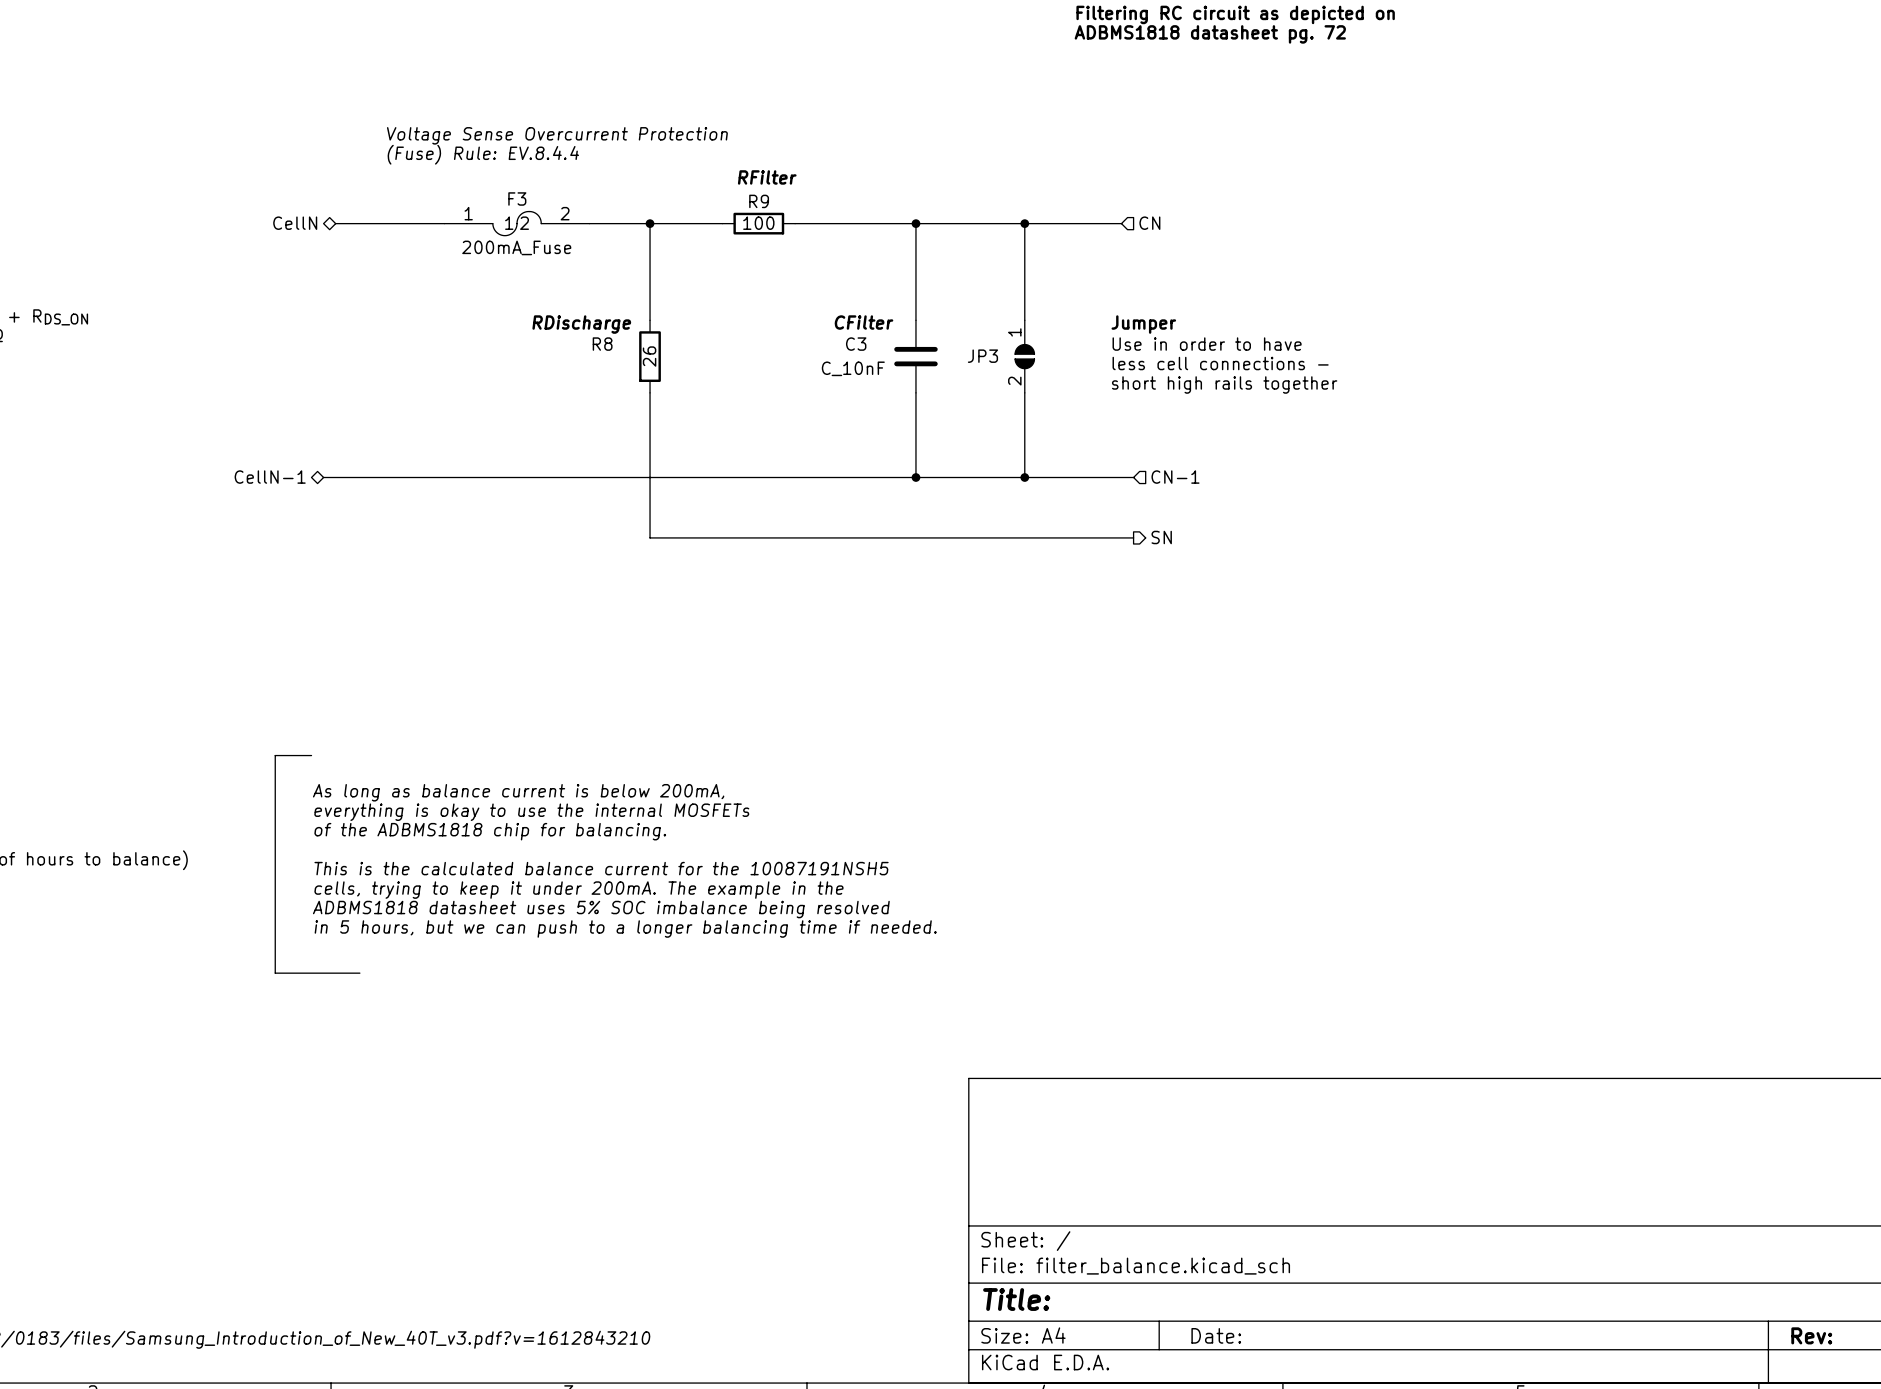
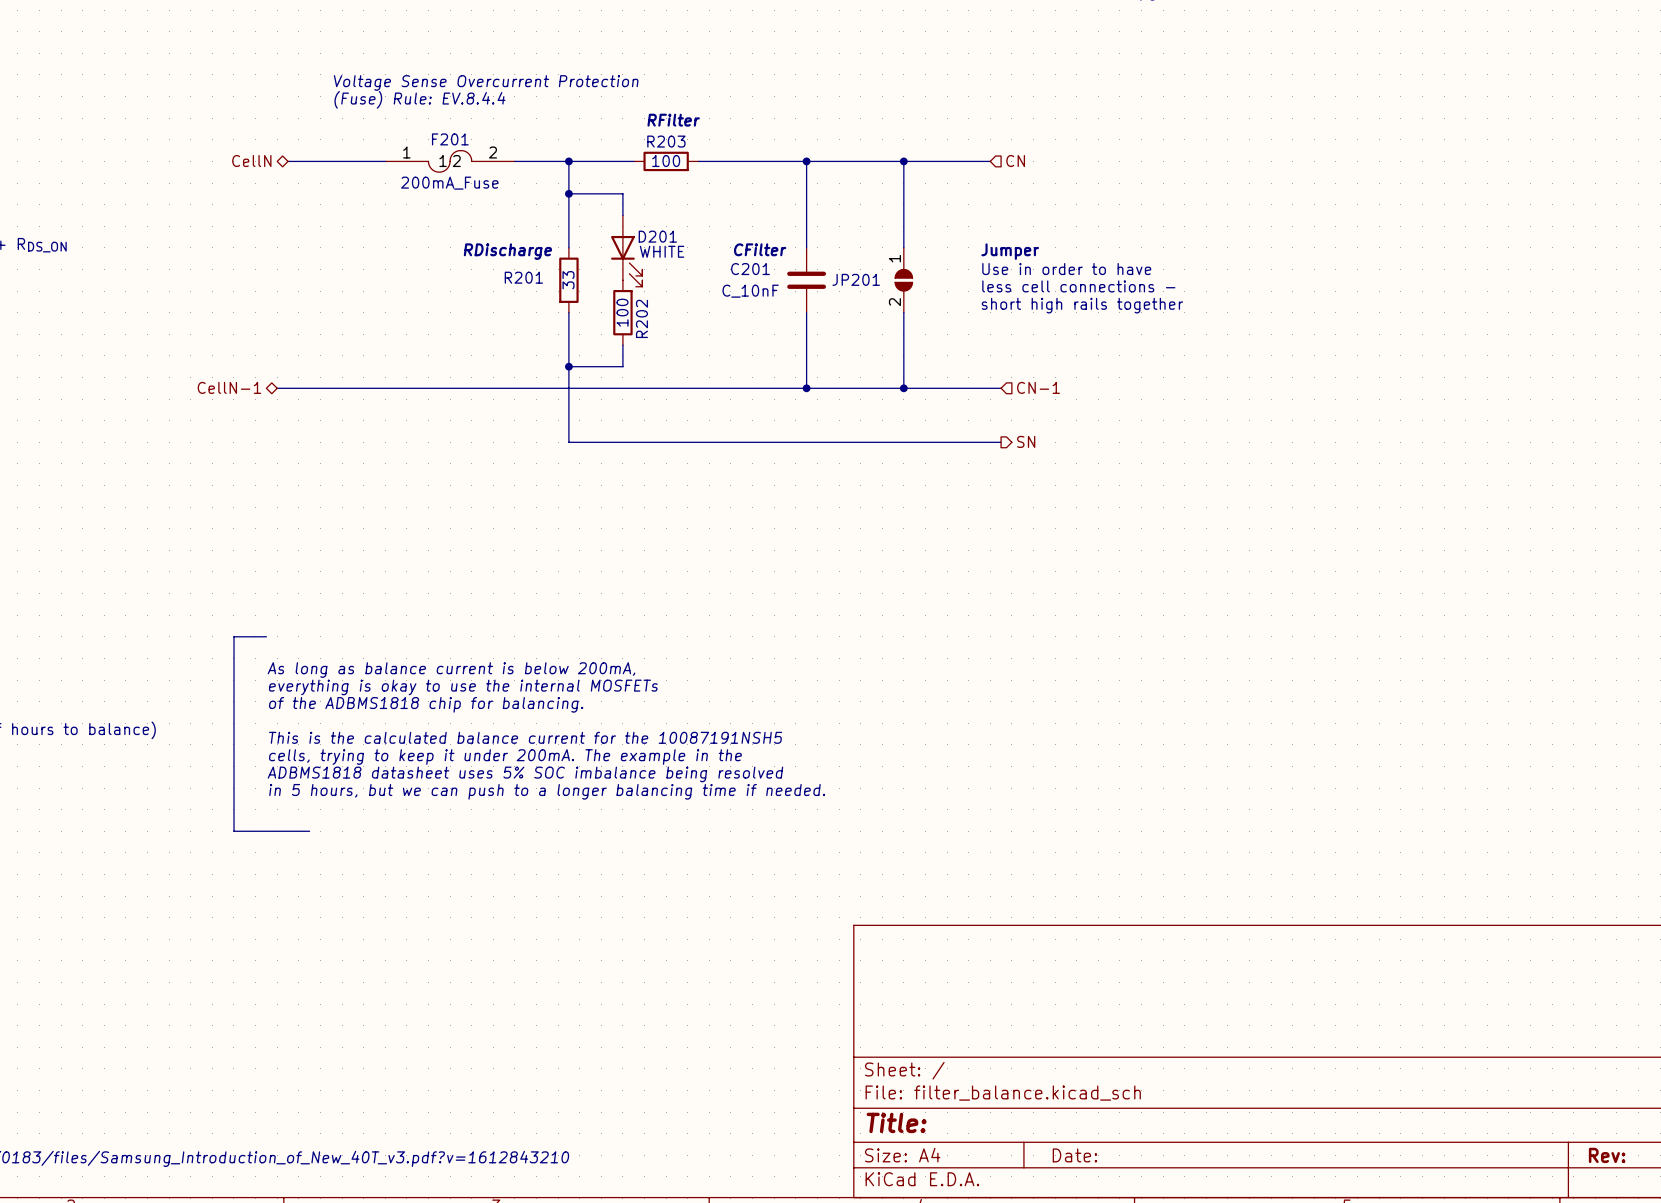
F3 name: F3 (517, 199) -> F201 (450, 139)
R9 name: R9 (759, 201) -> R203 (666, 141)
wire: none -> (568, 193) (622, 193) (622, 215)
junction: none -> (568, 193)
D201: none -> WHITE (626, 251)
R8 name: R8 (602, 344) -> R201 (523, 277)
C3 name: C3 (856, 344) -> C201 (750, 269)
R8 value: 26 (649, 356) -> 33 (568, 280)
JP3 name: JP3 (982, 356) -> JP201 (856, 279)
R202: none -> 100 (622, 312)
wire: none -> (622, 345) (622, 366) (568, 366)
junction: none -> (568, 366)

